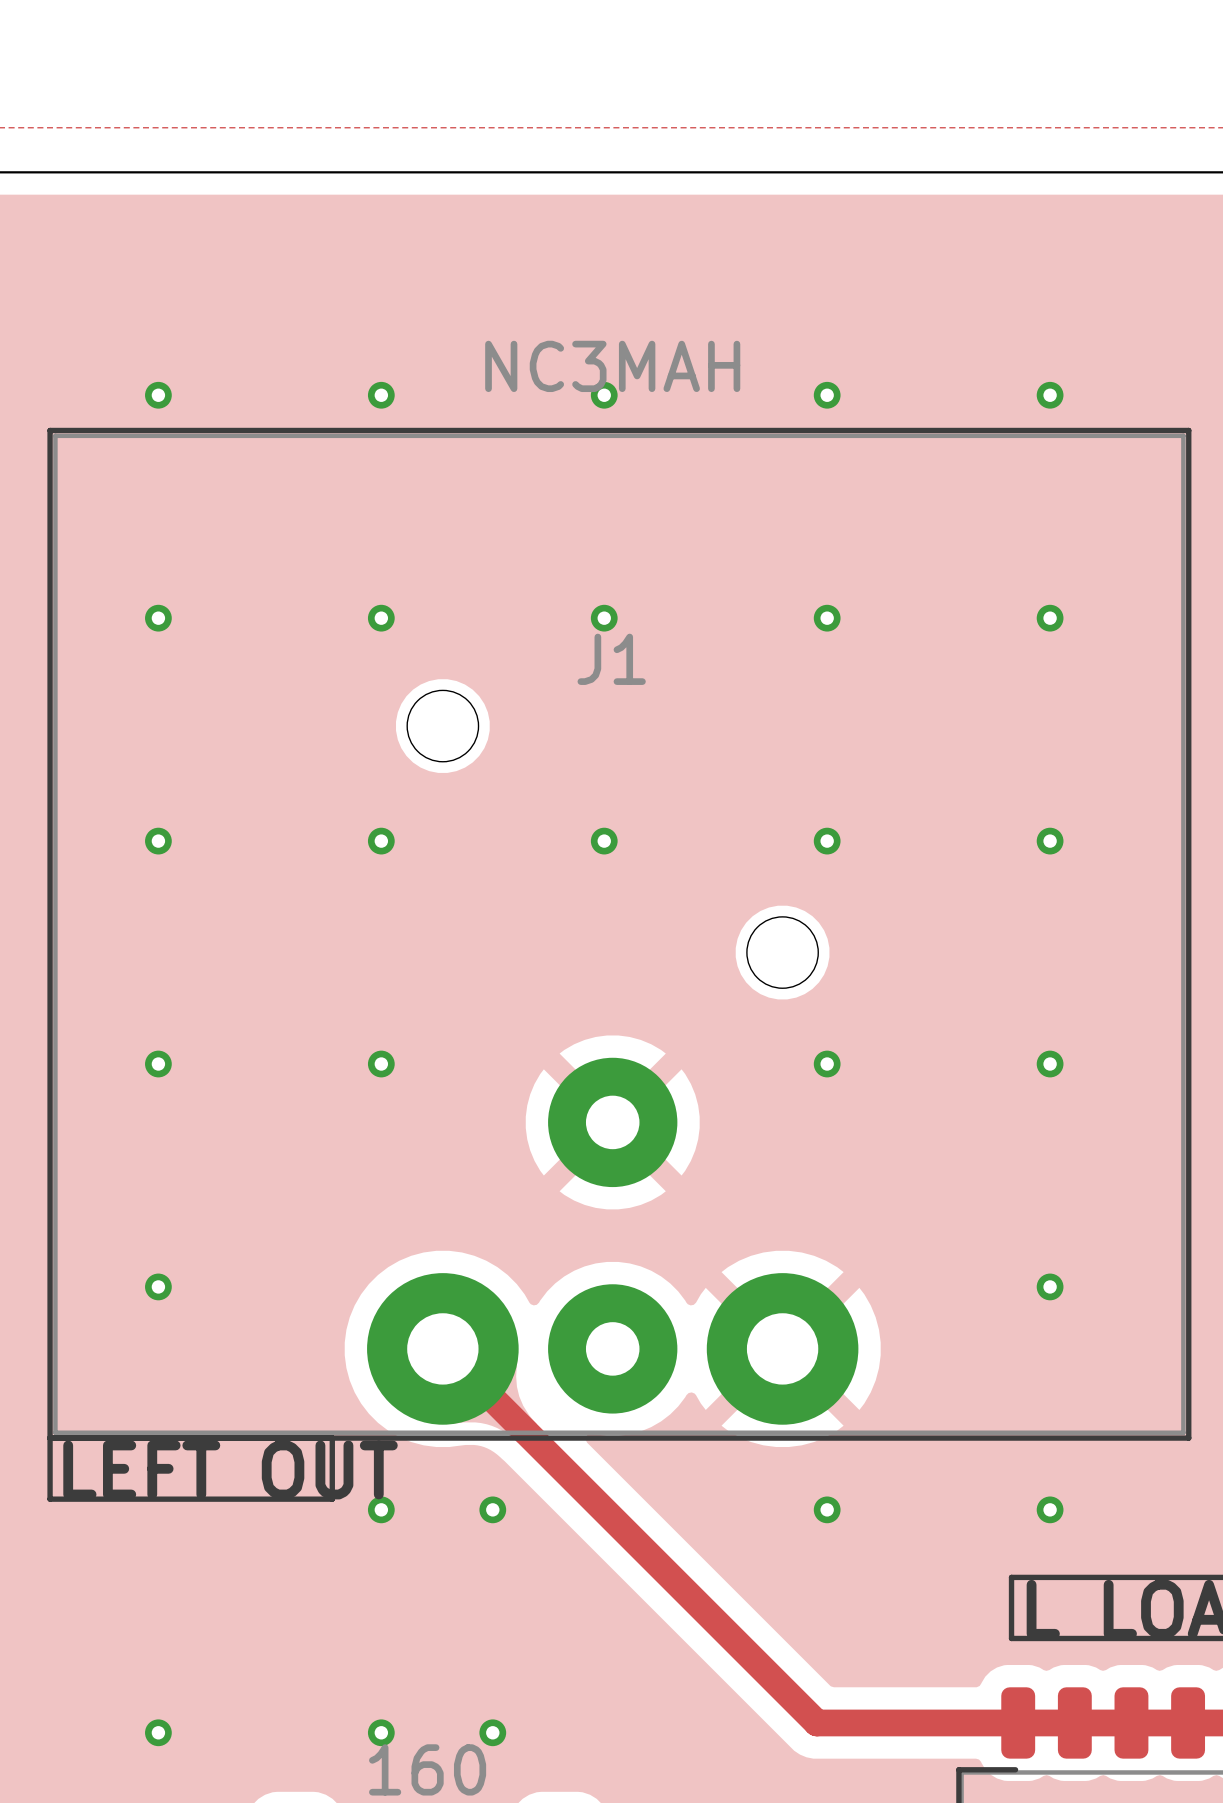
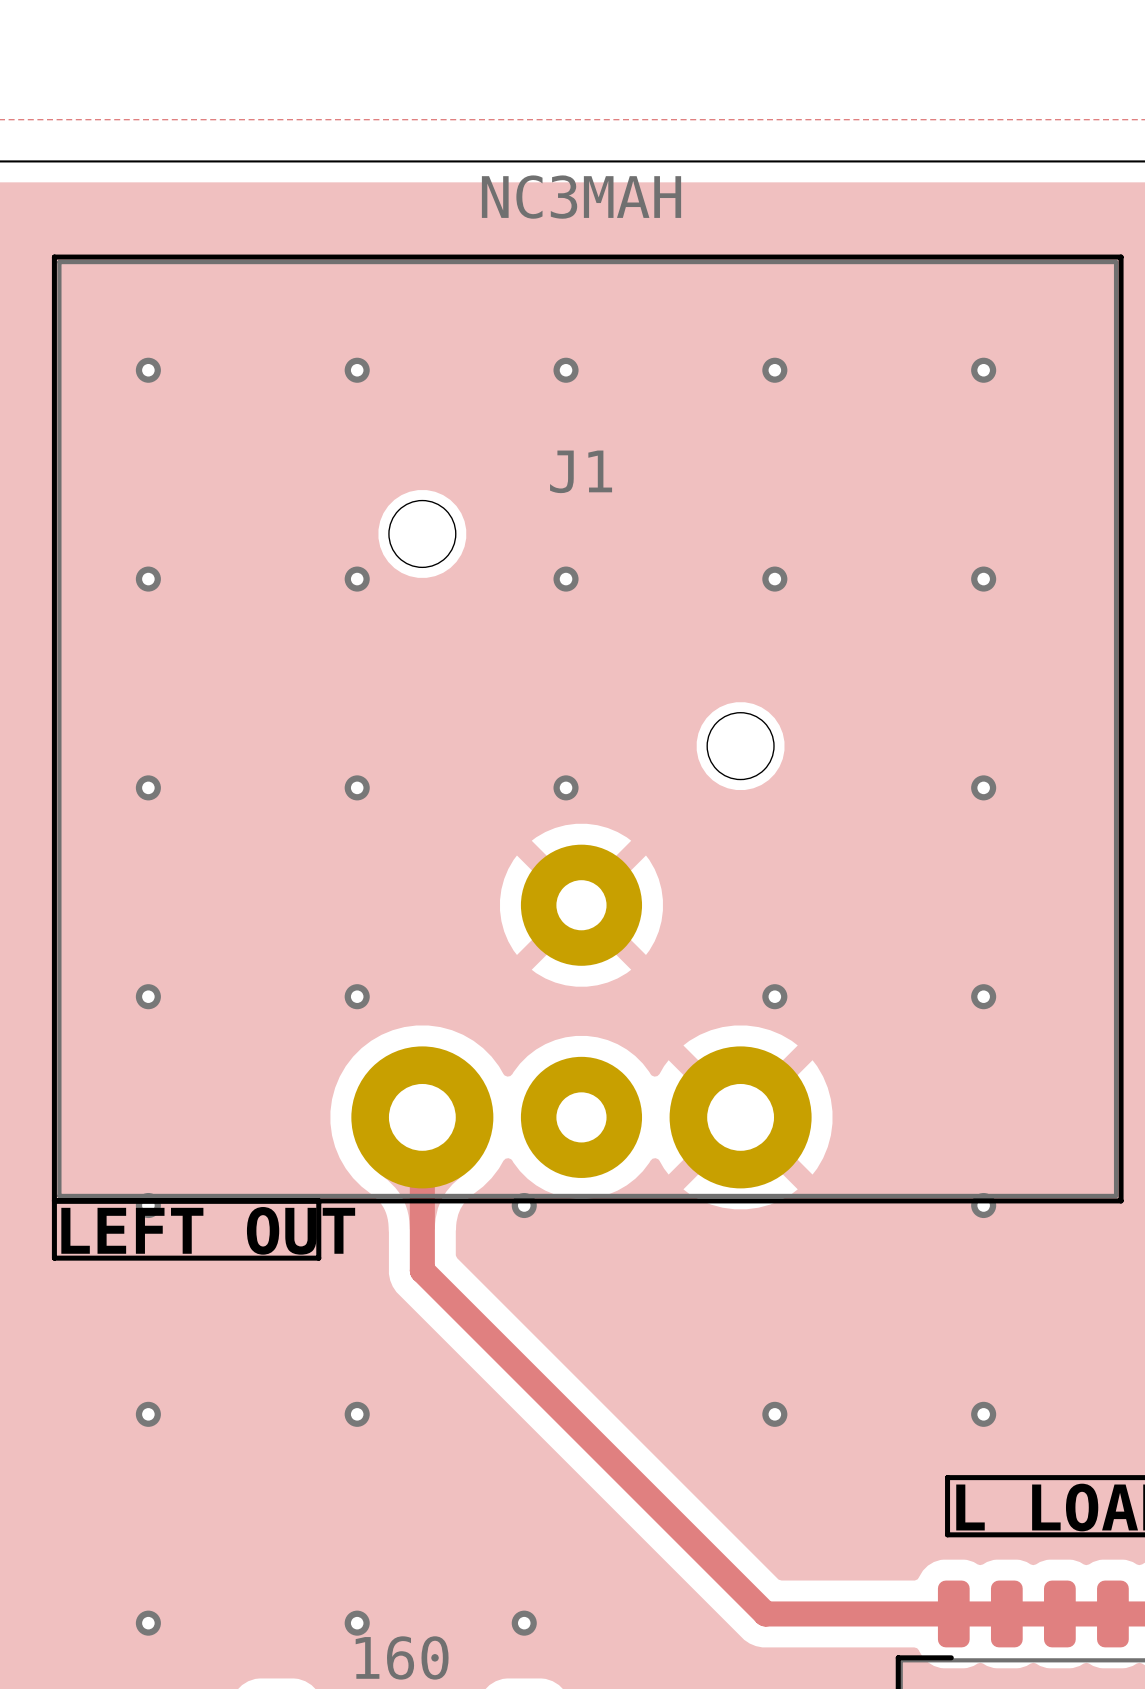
via: (827, 841) -> none
J1 position: (619, 934) -> (587, 729)
via: none -> (524, 1205)
track: (442, 1348) (816, 1722) -> (422, 1117) (422, 1270) (765, 1613)
line: (50, 1438) (332, 1438) (332, 1499) (50, 1499) (50, 1438) -> (54, 1200) (318, 1200) (318, 1258) (54, 1258) (54, 1200)
text position: LEFT OUT (230, 1469) -> LEFT OUT (208, 1230)
via: none -> (148, 1414)
via: (492, 1509) -> none
via position: (492, 1732) -> (524, 1623)

